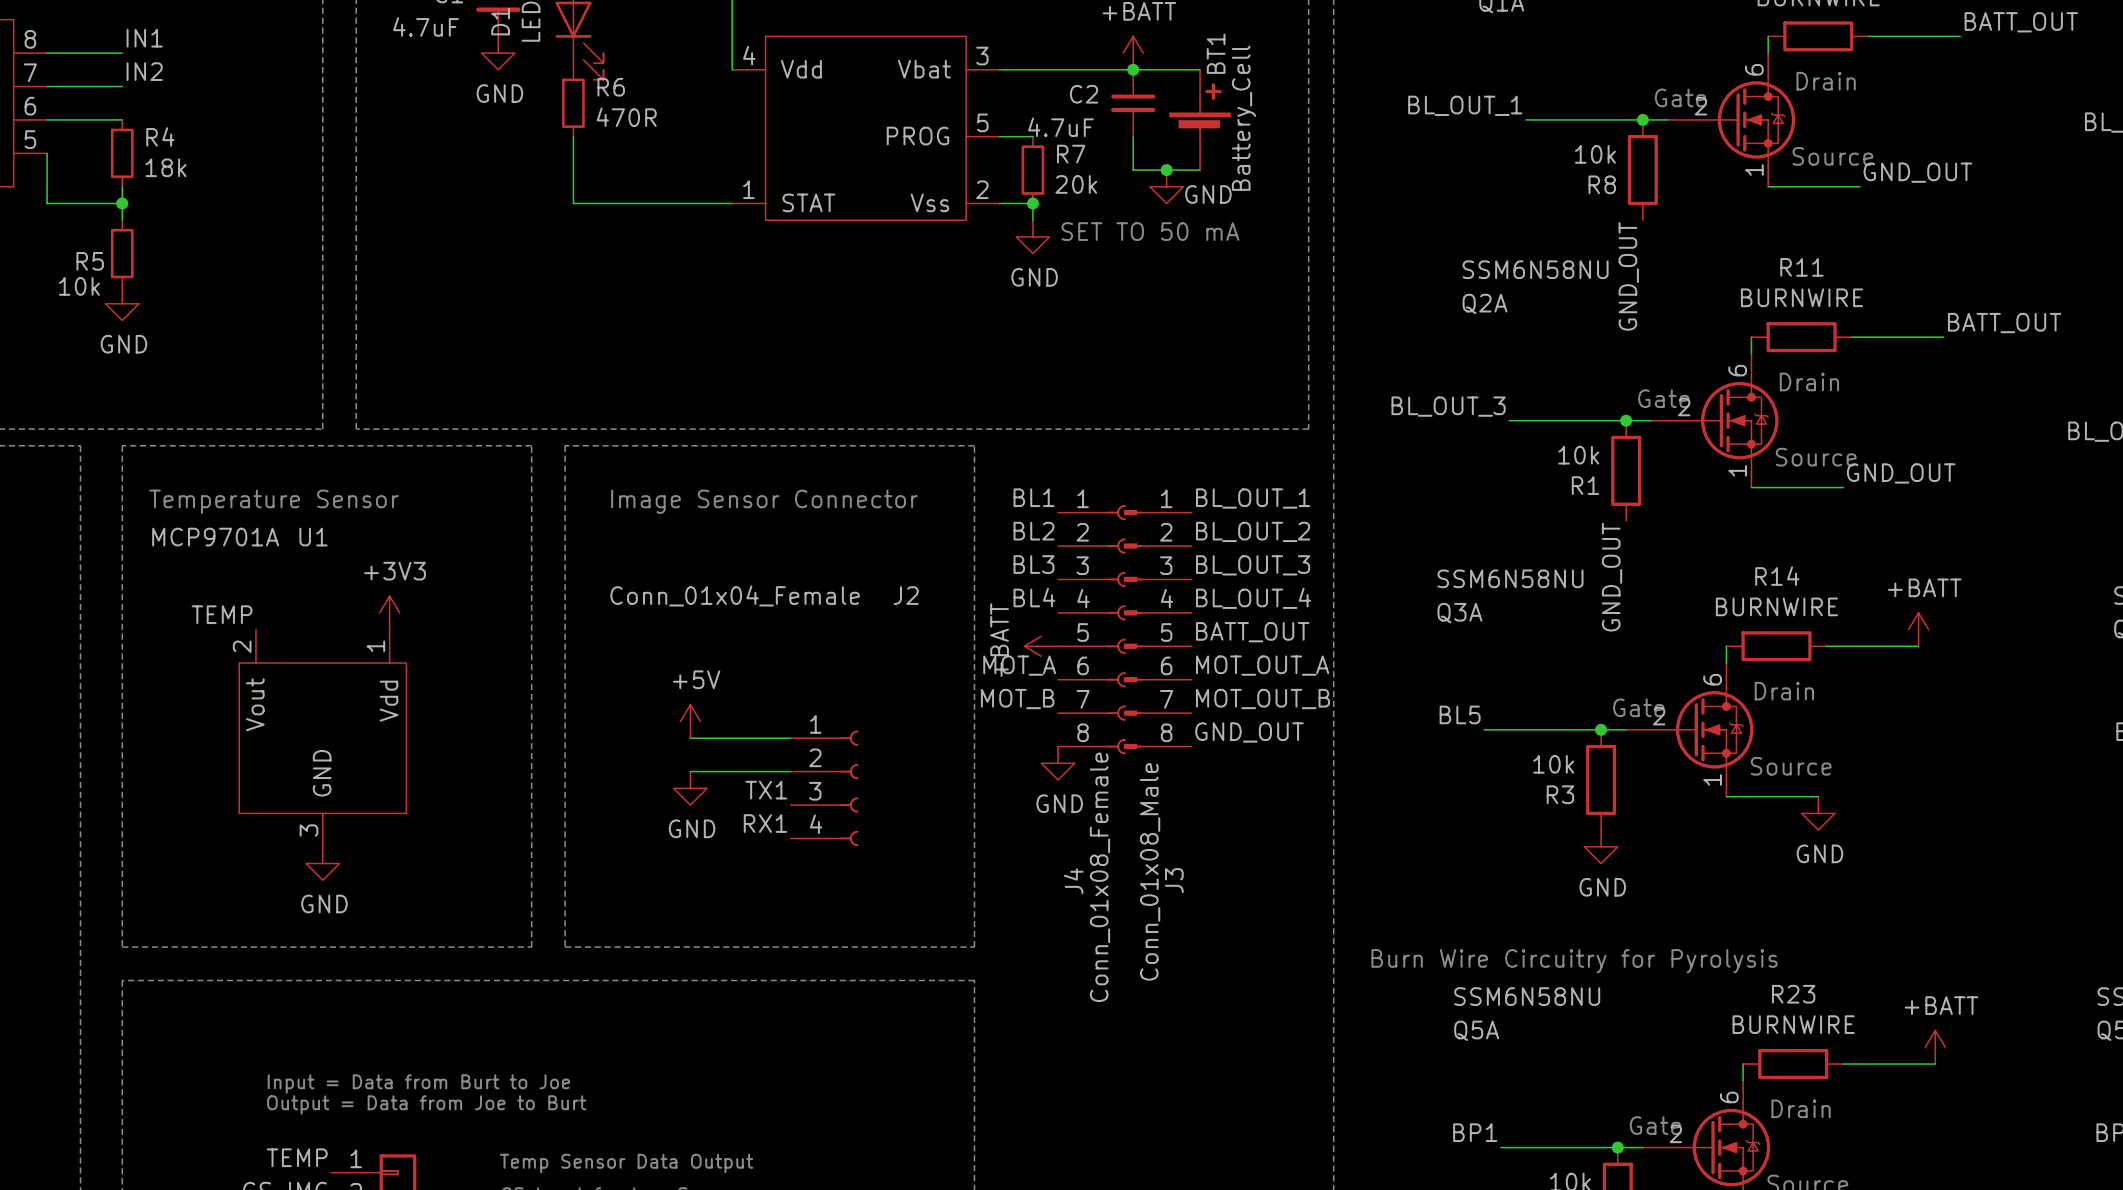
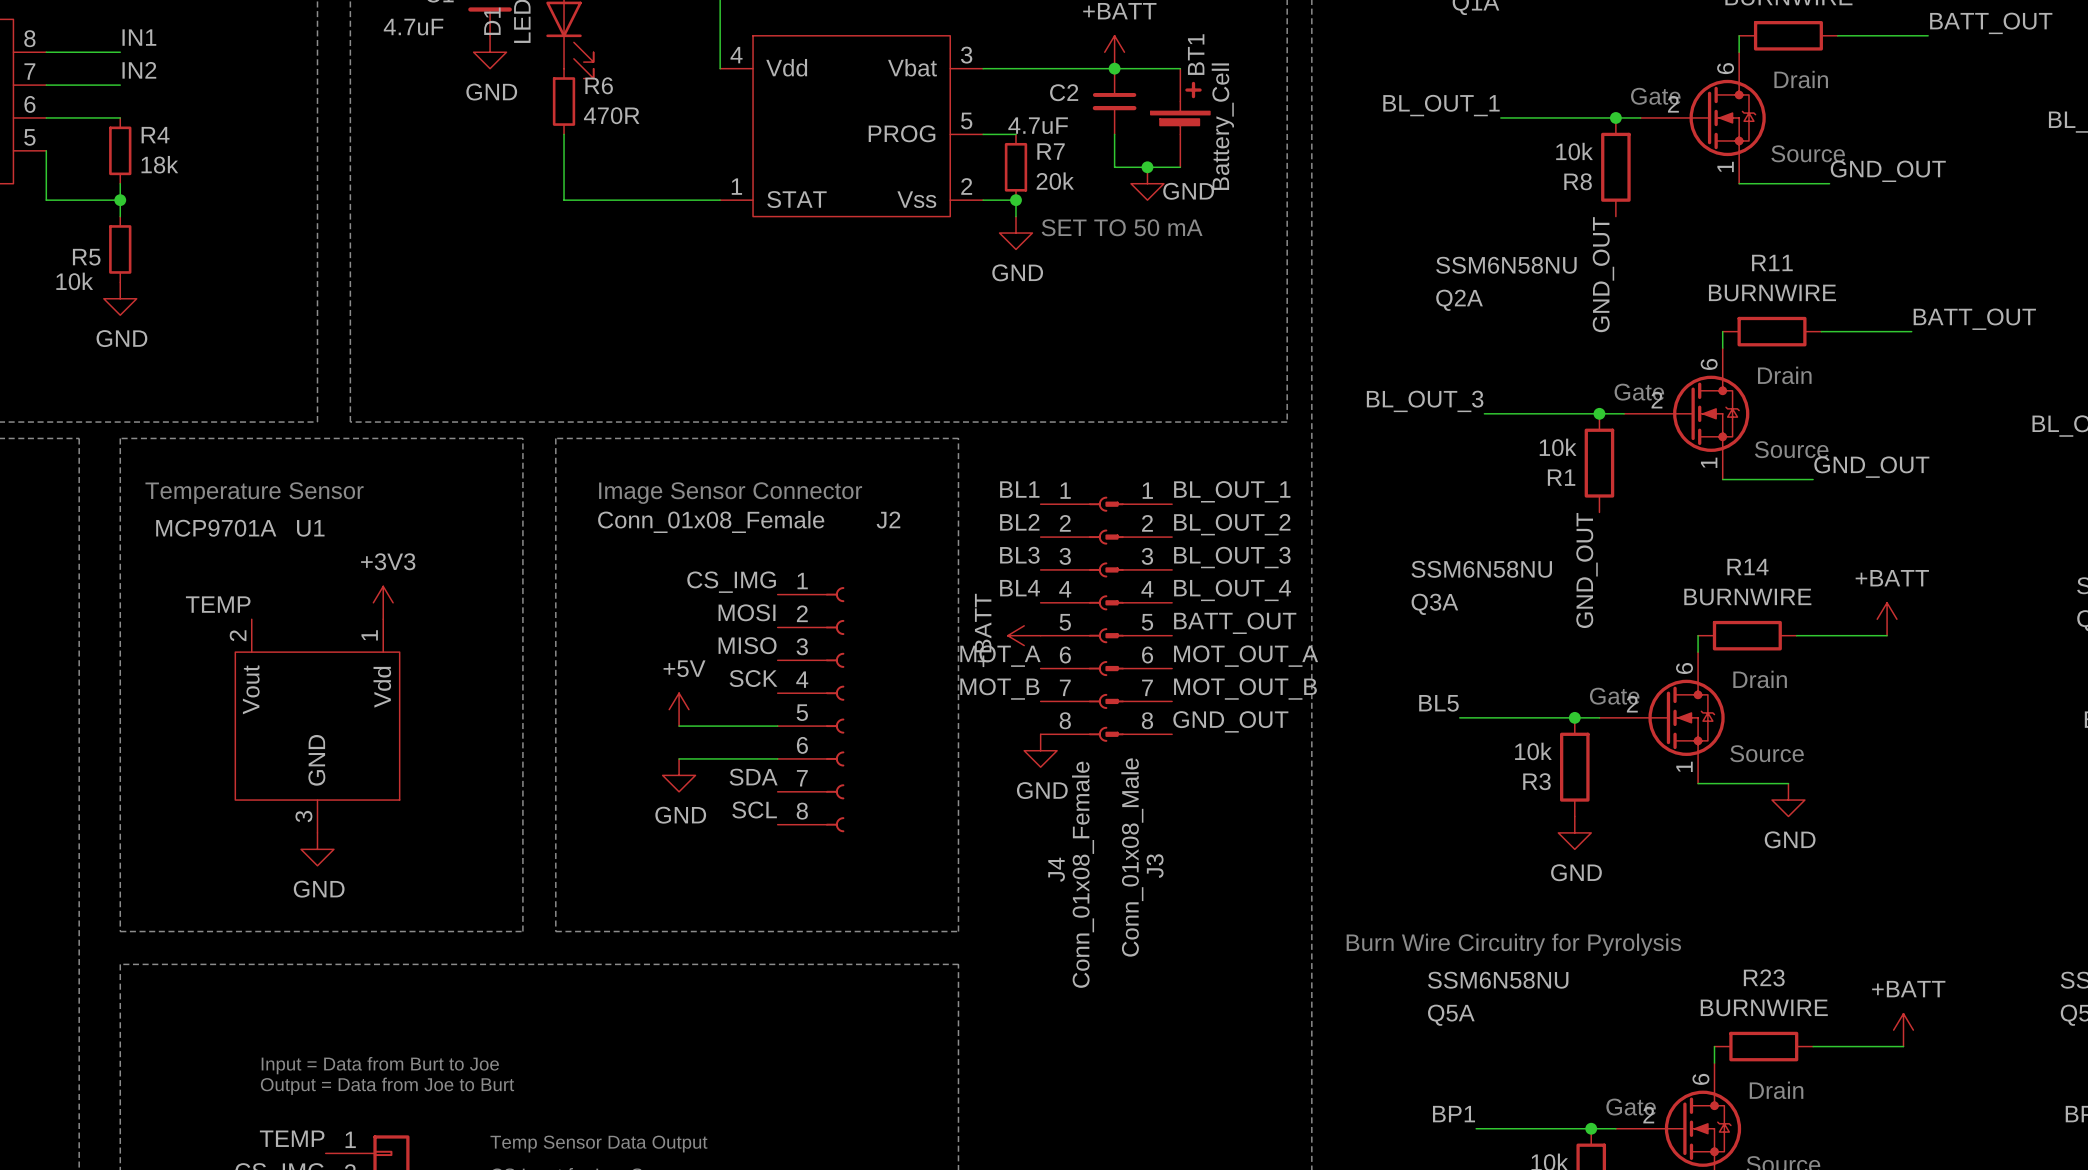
label: none -> CS_IMG (731, 582)
J2 value: Conn_01x04_Female (735, 595) -> Conn_01x08_Female (711, 521)
label: none -> MOSI (747, 612)
label: none -> MISO (747, 645)
label: none -> SCK (753, 678)
J2 symbol: [790, 730, 859, 847] -> [777, 587, 845, 833]
label: TX1 (766, 790) -> SDA (753, 777)
label: RX1 (765, 823) -> SCL (754, 810)

